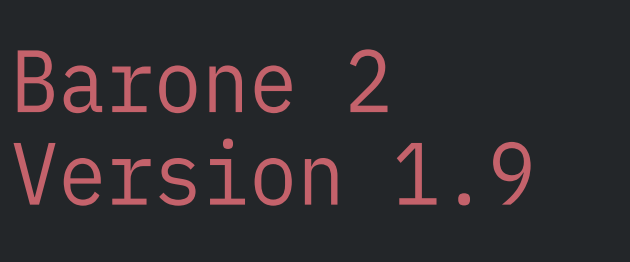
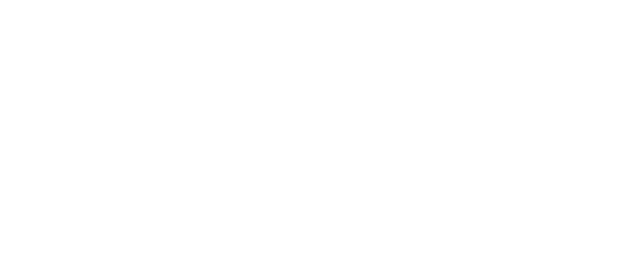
text: Barone 2 (202, 81) -> none
text: Version 1.9 (272, 172) -> none

